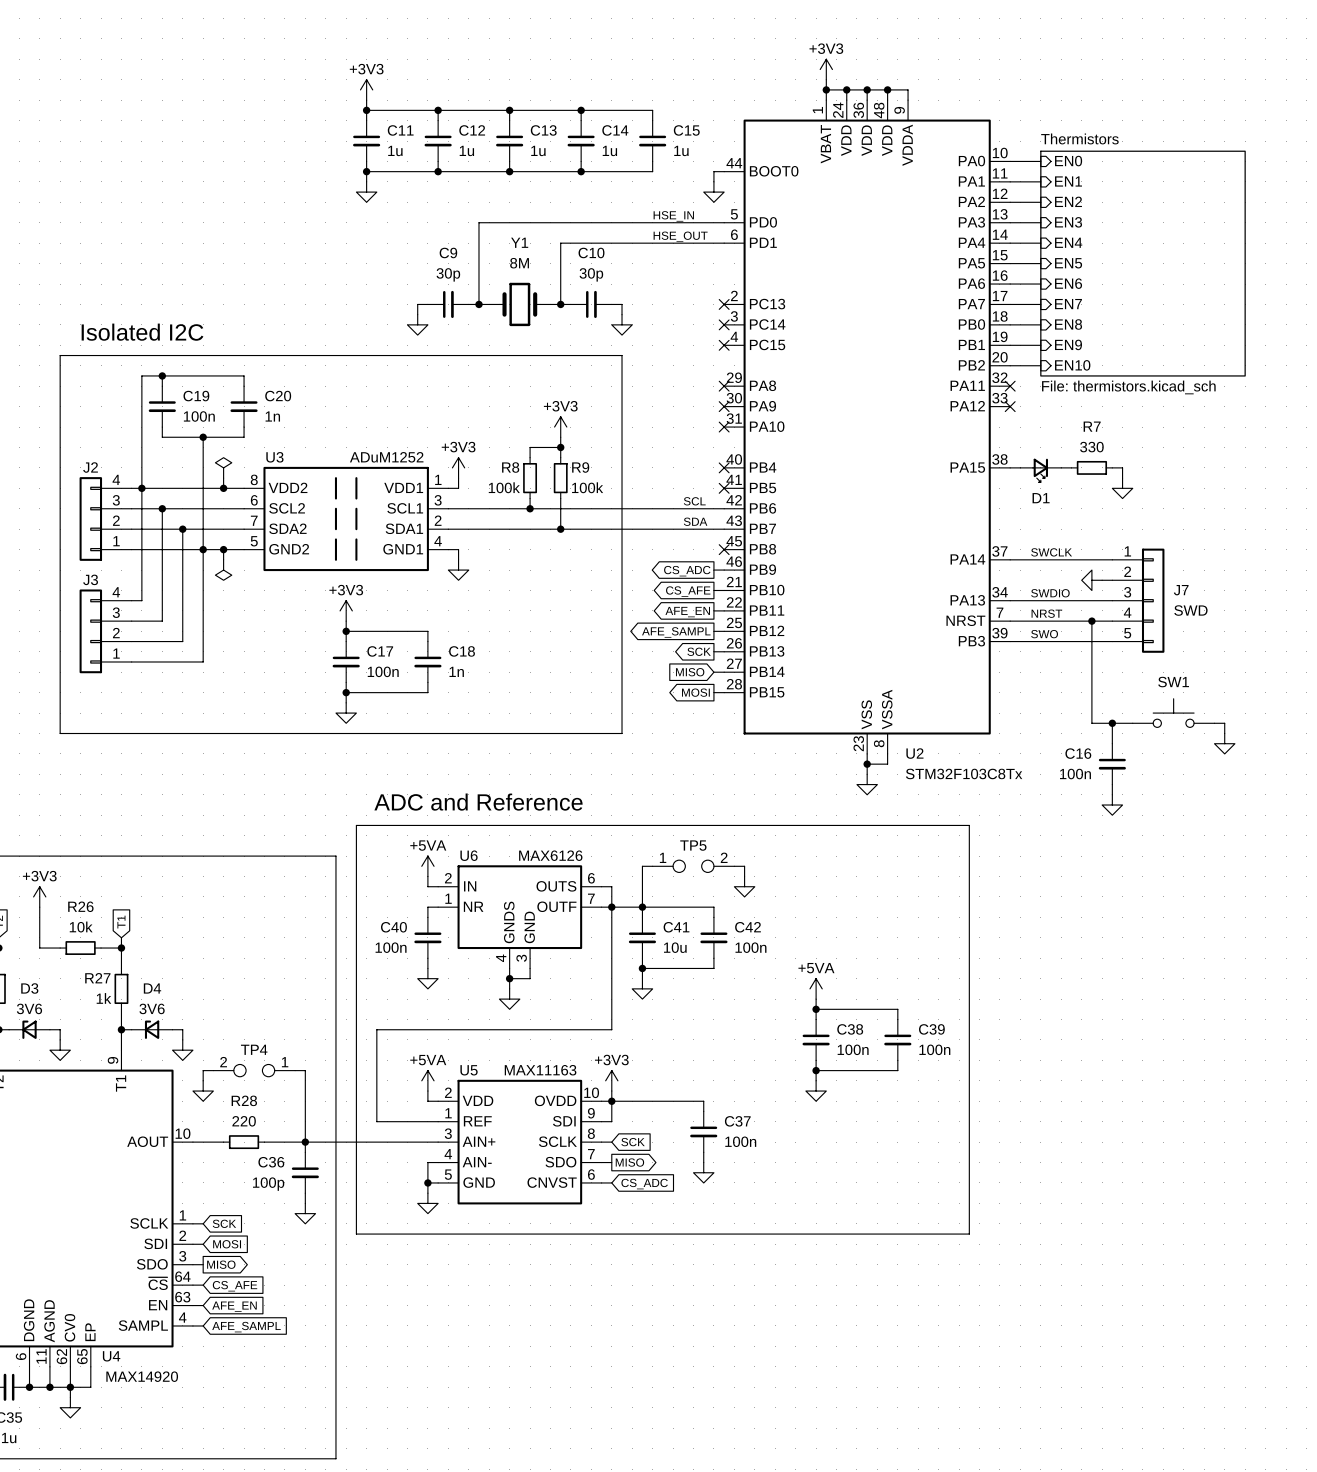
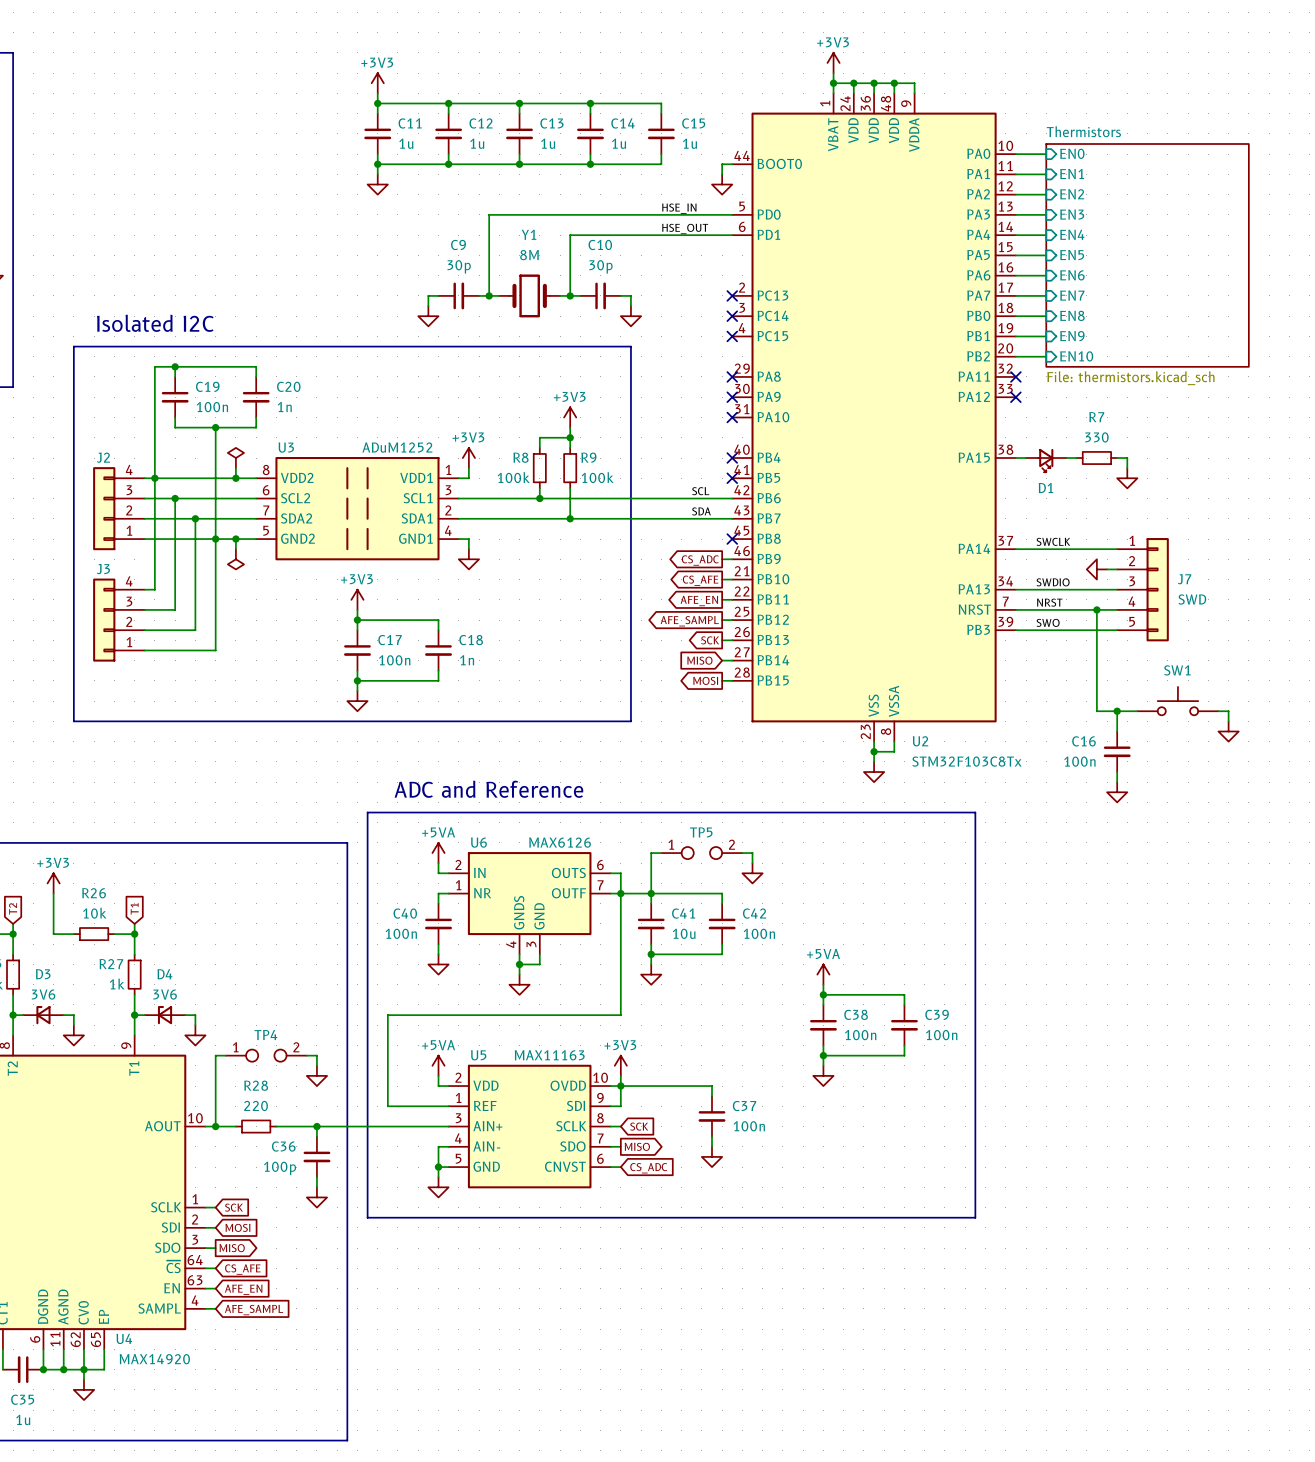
TP4 rotation: 0° (254, 1070) -> 180° (266, 1055)
wire: (305, 1080) (305, 1142) -> (215, 1065) (215, 1126)
power symbol position: (203, 1091) -> (316, 1075)
junction: none -> (215, 1126)

